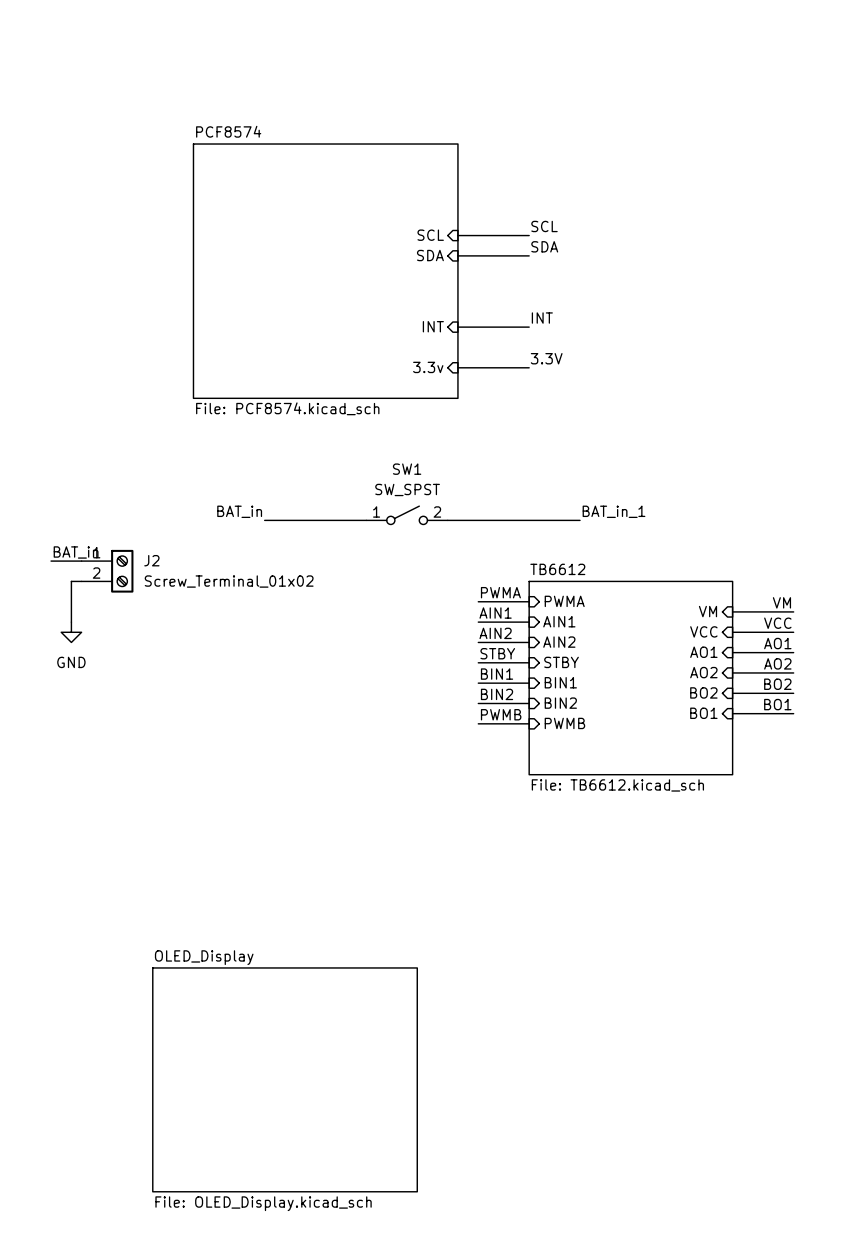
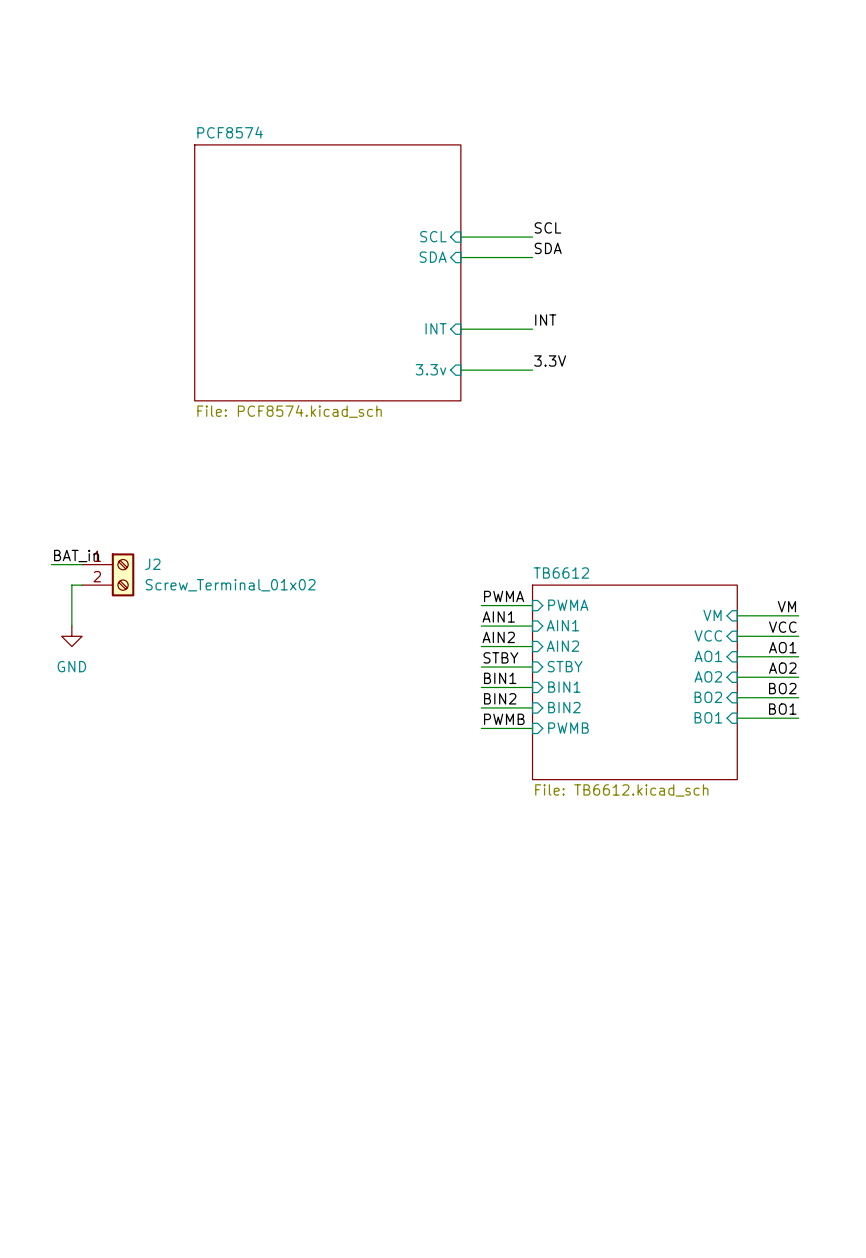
label: BAT_in (239, 511) -> none
label: BAT_in_1 (614, 511) -> none
SW1: SW_SPST (407, 515) -> none
wire: (264, 520) (366, 520) -> none
wire: (447, 520) (580, 520) -> none
sheet OLED_Display: File: OLED_Display.kicad_sch (285, 1079) -> none

